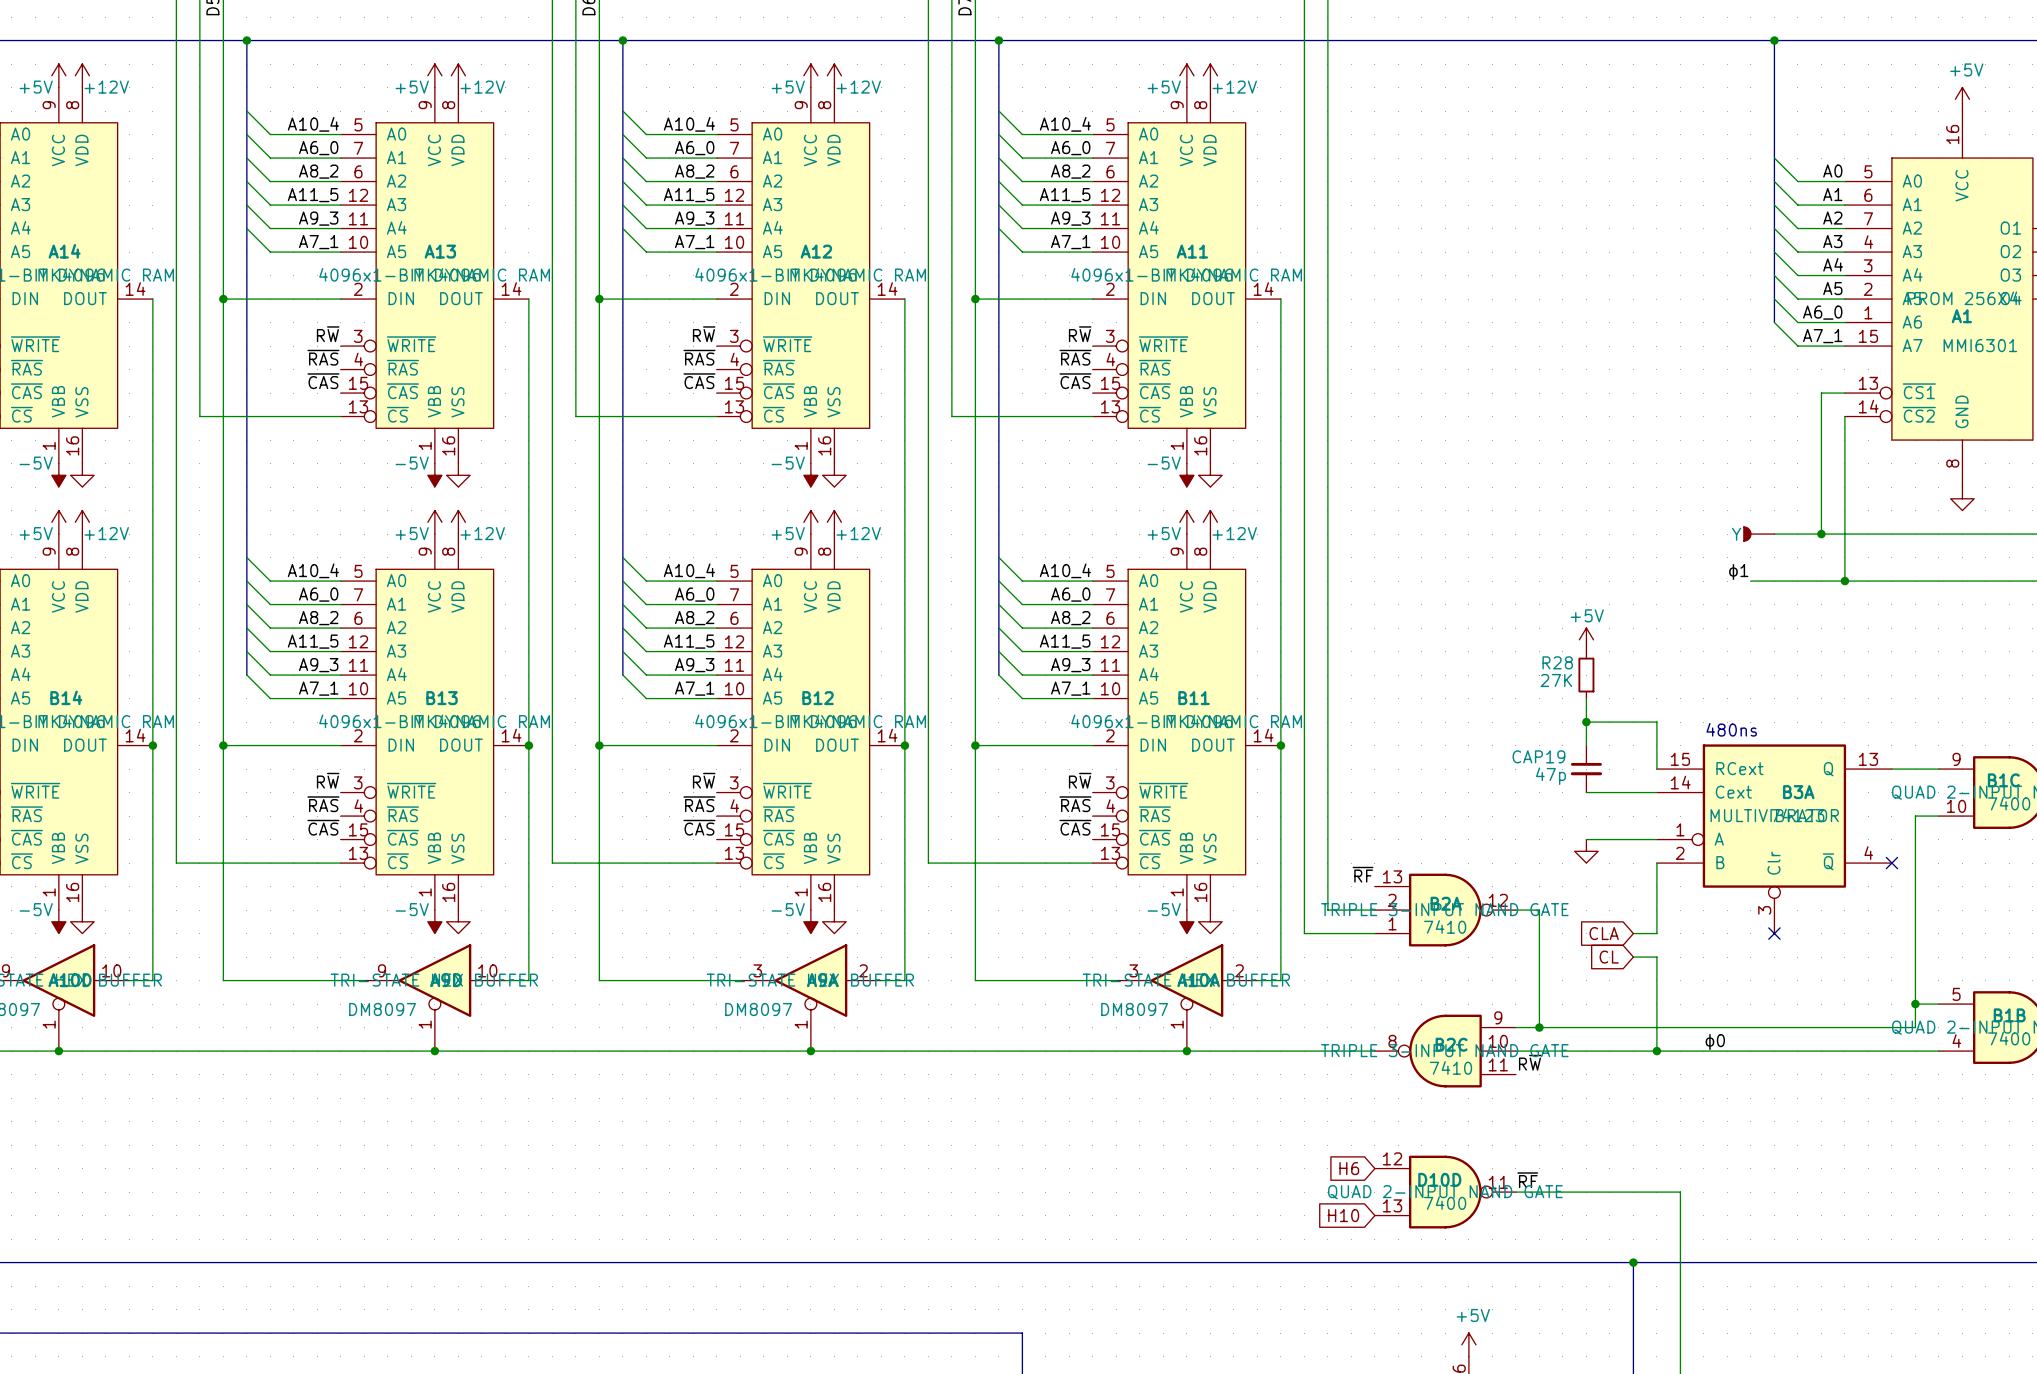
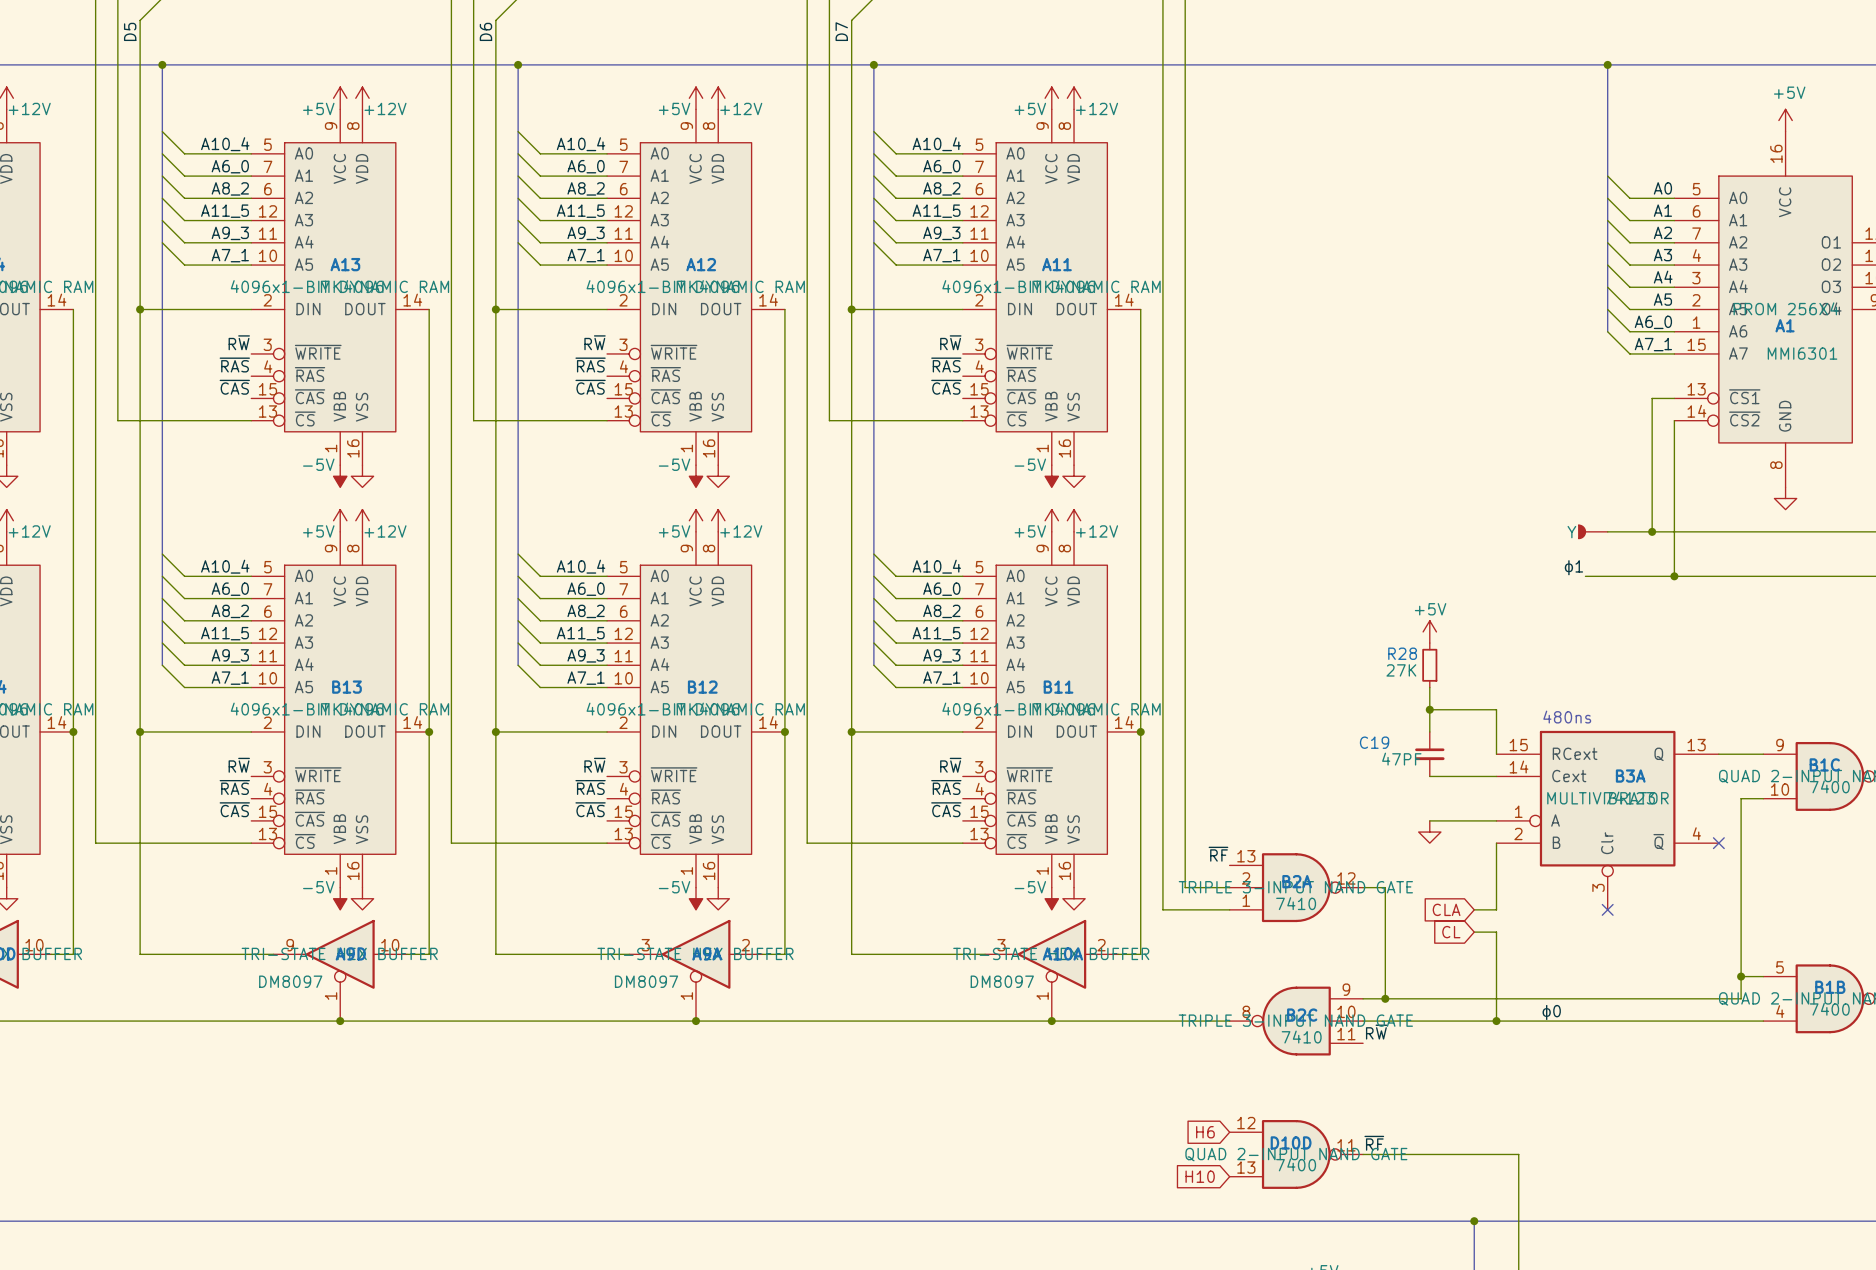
CAP19 name: CAP19 (1538, 756) -> C19 (1374, 742)
CAP19 value: 47p (1550, 776) -> 47PF (1401, 759)

